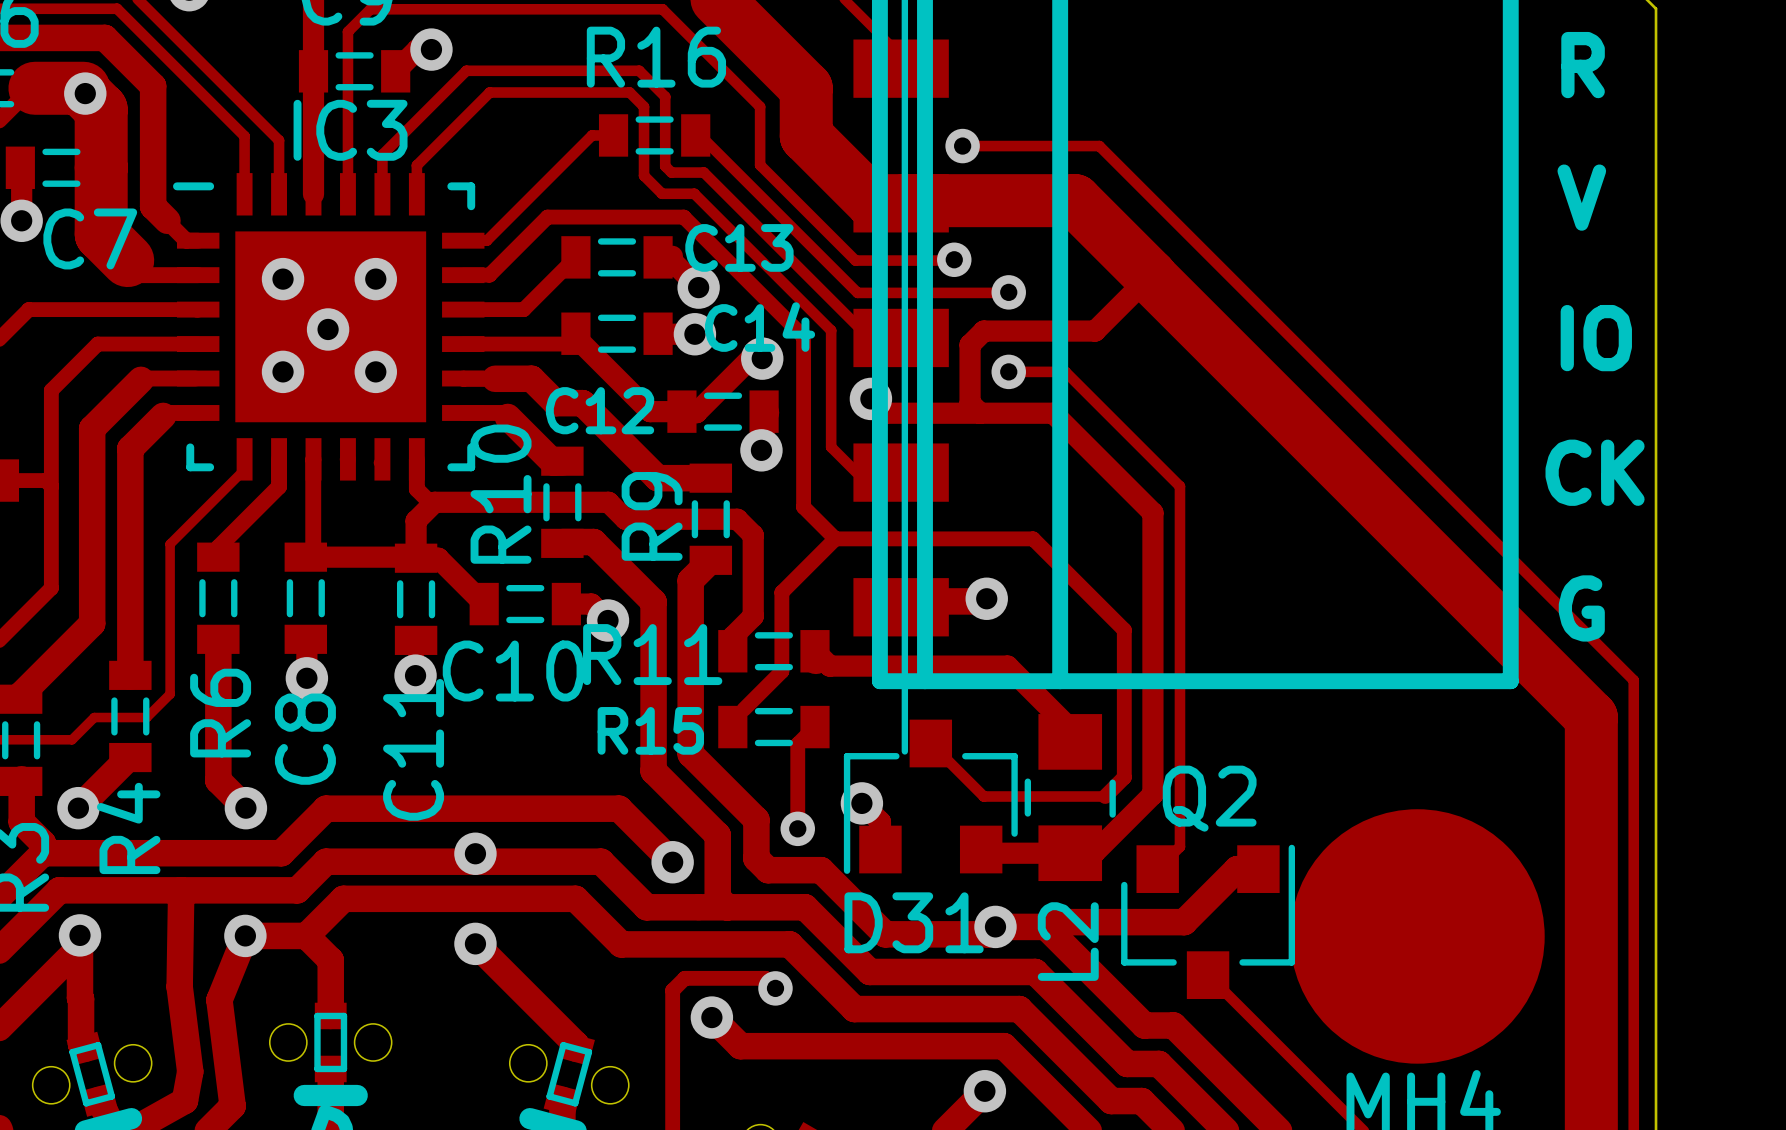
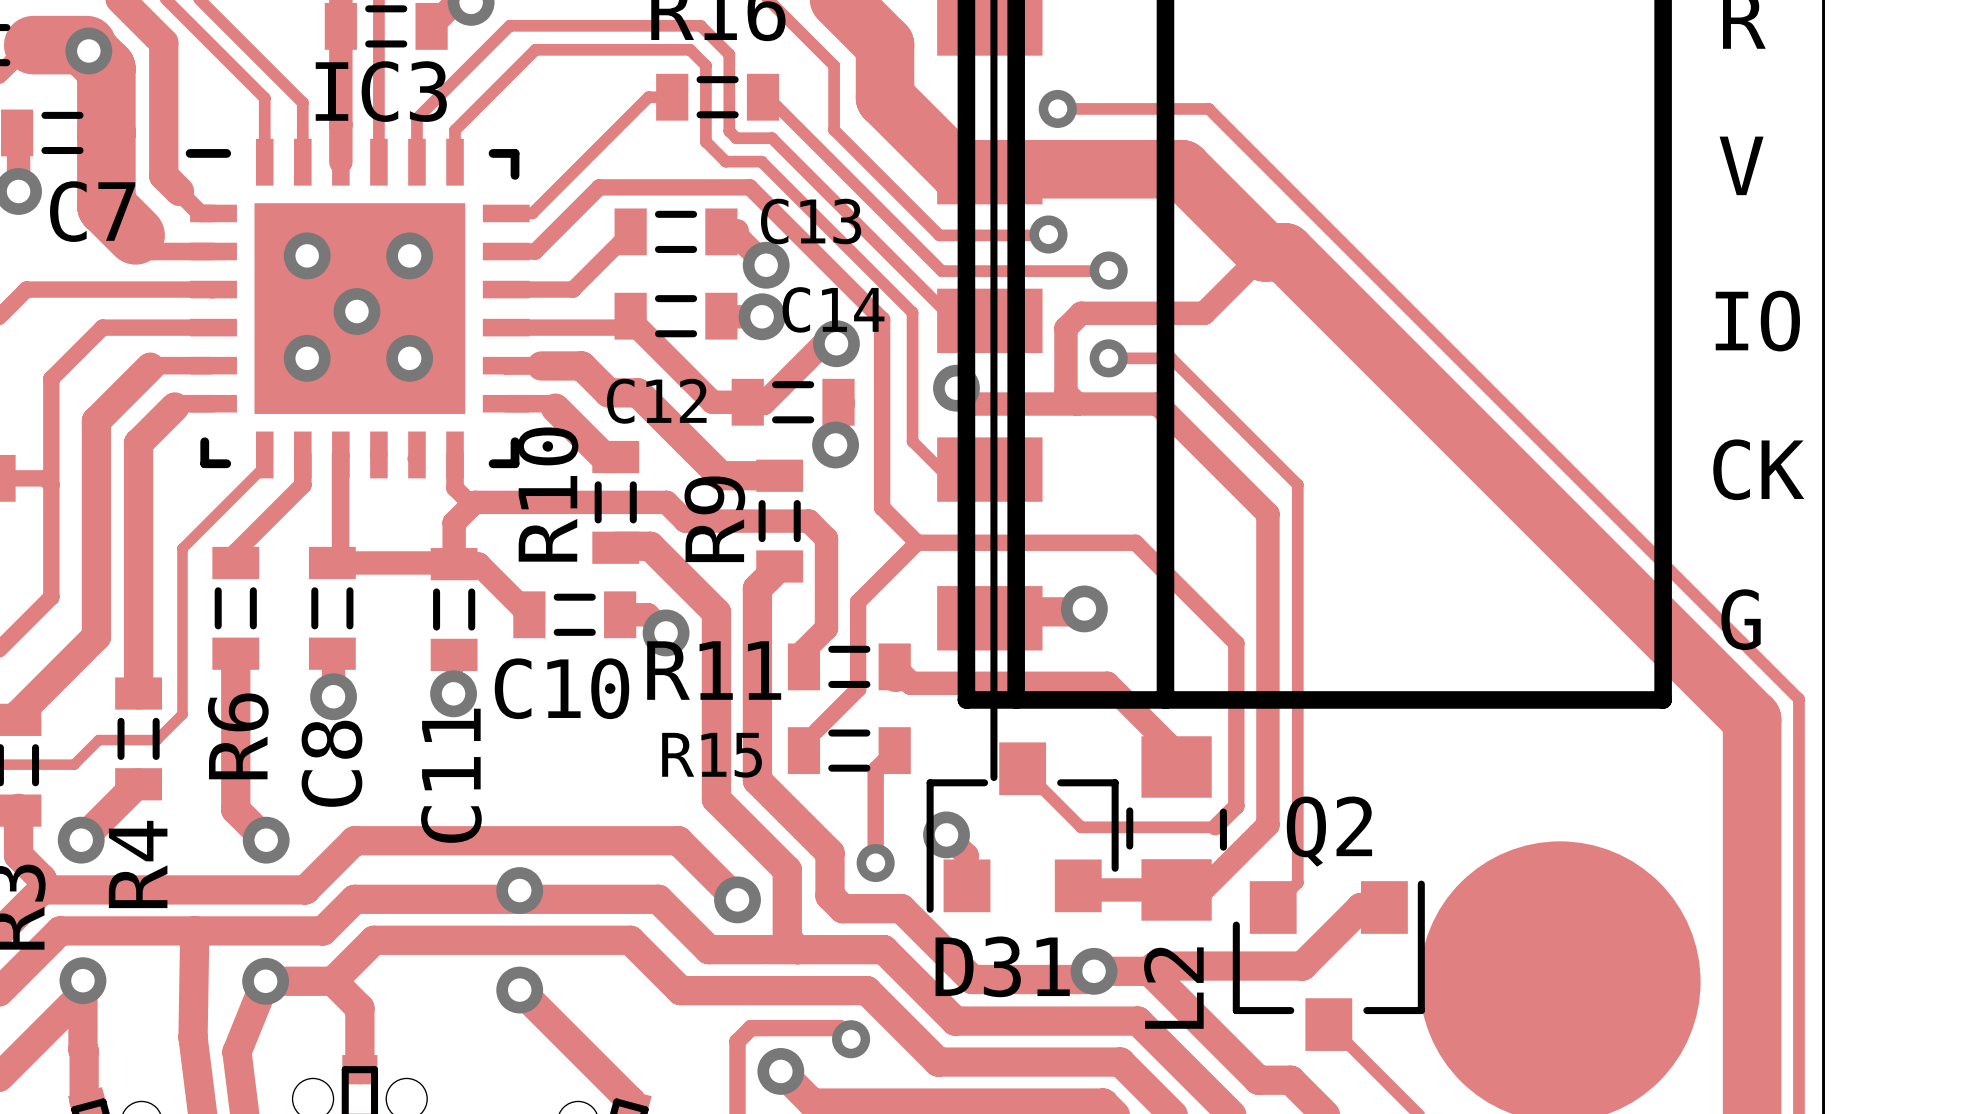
track: (1150, 276) (1591, 717) -> (1265, 252) (1284, 252) (1752, 719) (1752, 740)

